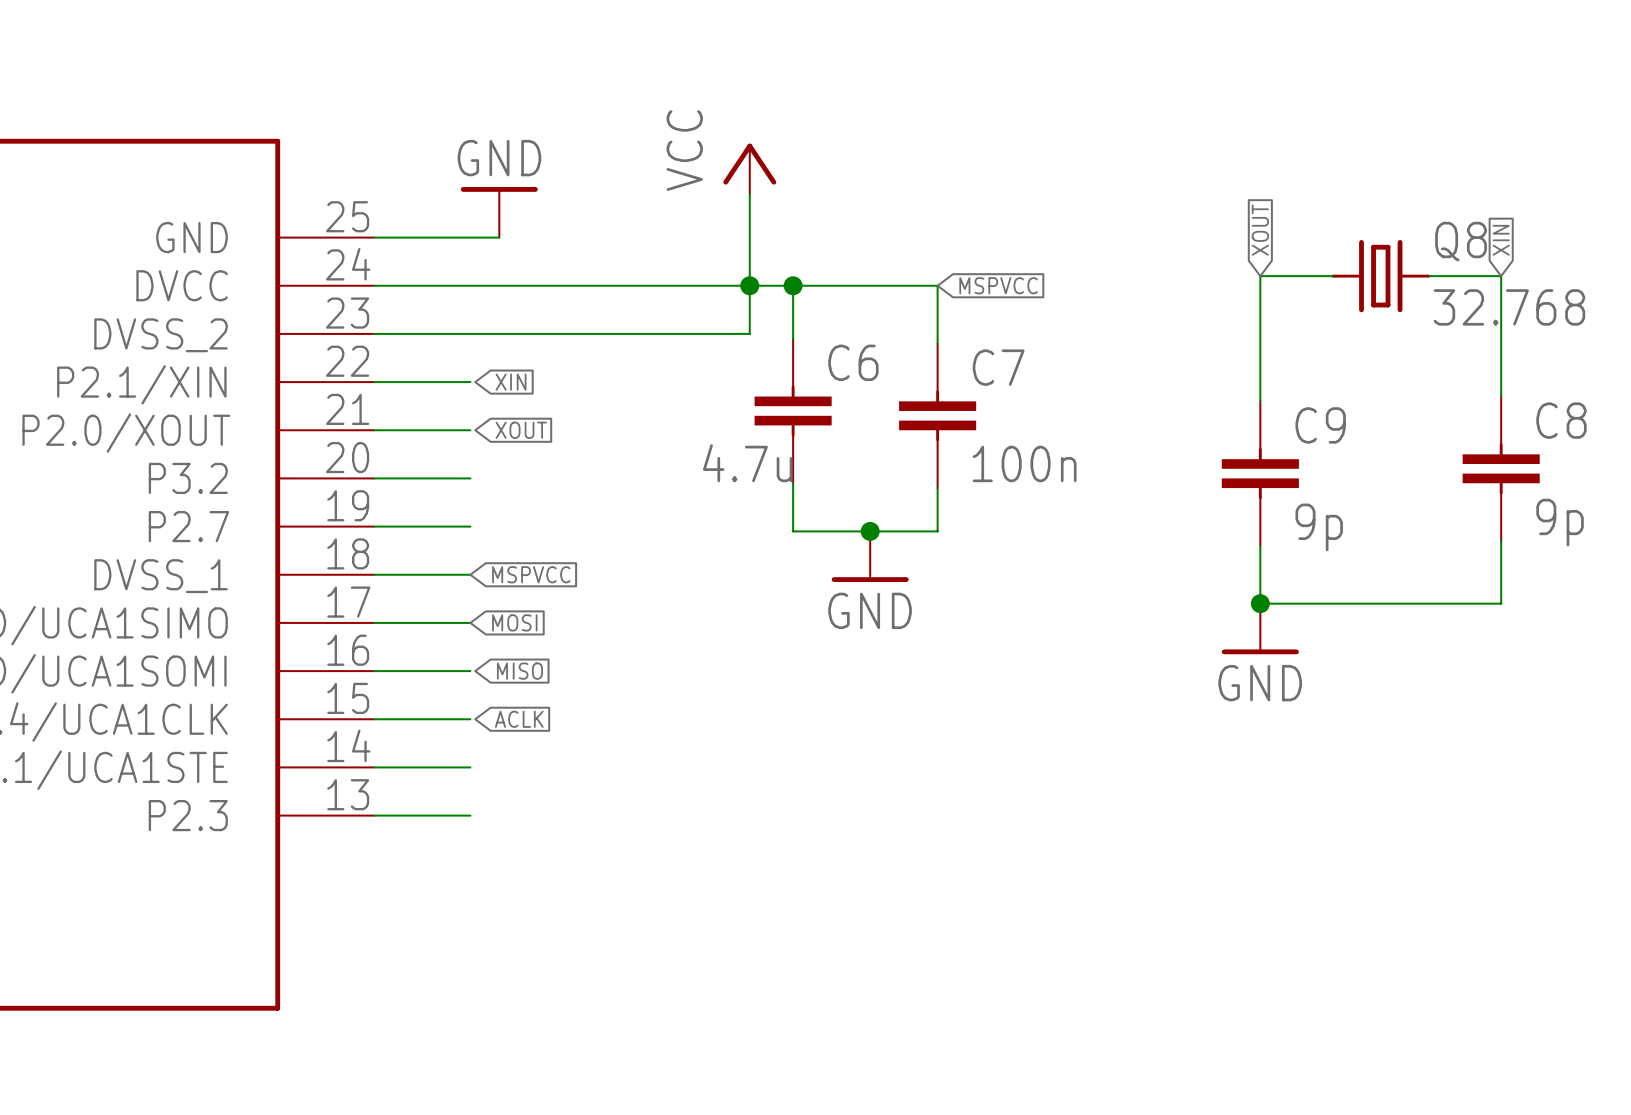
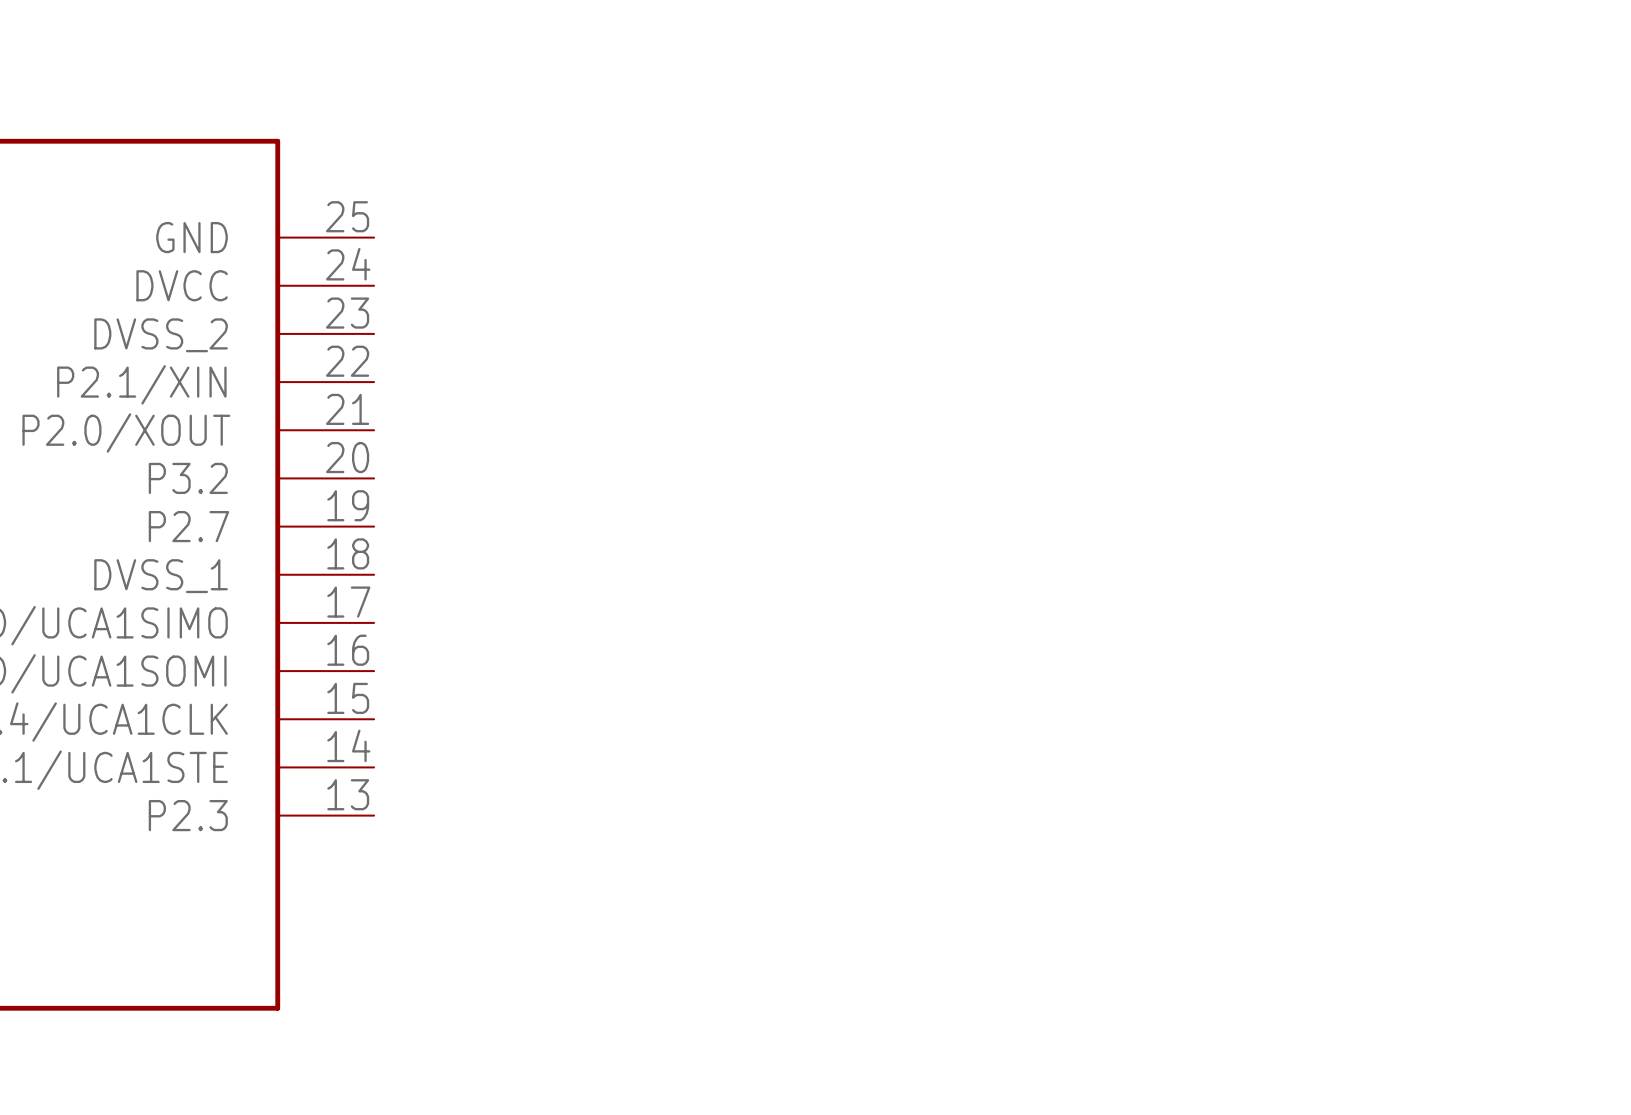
power symbol: VCC (749, 168) -> none
wire: (749, 194) (749, 333) (374, 333) -> none
power symbol: GND (499, 212) -> none
global label: XOUT (1260, 230) -> none
wire: (374, 237) (499, 237) -> none
global label: XIN (1501, 240) -> none
wire: (1332, 276) (1260, 276) (1260, 401) -> none
Q8: 32.768 (1380, 276) -> none
wire: (1428, 276) (1501, 276) (1501, 396) -> none
wire: (374, 285) (937, 285) (937, 343) -> none
junction: (749, 285) -> none
wire: (793, 285) (793, 338) -> none
junction: (793, 285) -> none
global label: MSPVCC (998, 285) -> none
wire: (374, 382) (470, 382) -> none
global label: XIN (511, 382) -> none
C6: 4.7u (793, 410) -> none
C7: 100n (937, 415) -> none
wire: (374, 430) (470, 430) -> none
global label: XOUT (521, 430) -> none
C8: 9p (1501, 468) -> none
C9: 9p (1260, 473) -> none
wire: (374, 478) (470, 478) -> none
wire: (793, 483) (793, 531) (937, 531) (937, 488) -> none
wire: (374, 526) (470, 526) -> none
junction: (870, 531) -> none
wire: (1501, 541) (1501, 603) (1260, 603) (1260, 545) -> none
power symbol: GND (870, 556) -> none
wire: (374, 574) (470, 574) -> none
global label: MSPVCC (531, 574) -> none
junction: (1260, 603) -> none
wire: (374, 622) (470, 622) -> none
global label: MOSI (514, 622) -> none
power symbol: GND (1260, 628) -> none
wire: (374, 671) (470, 671) -> none
global label: MISO (519, 671) -> none
wire: (374, 719) (470, 719) -> none
global label: ACLK (519, 719) -> none
wire: (374, 767) (470, 767) -> none
wire: (374, 815) (470, 815) -> none

